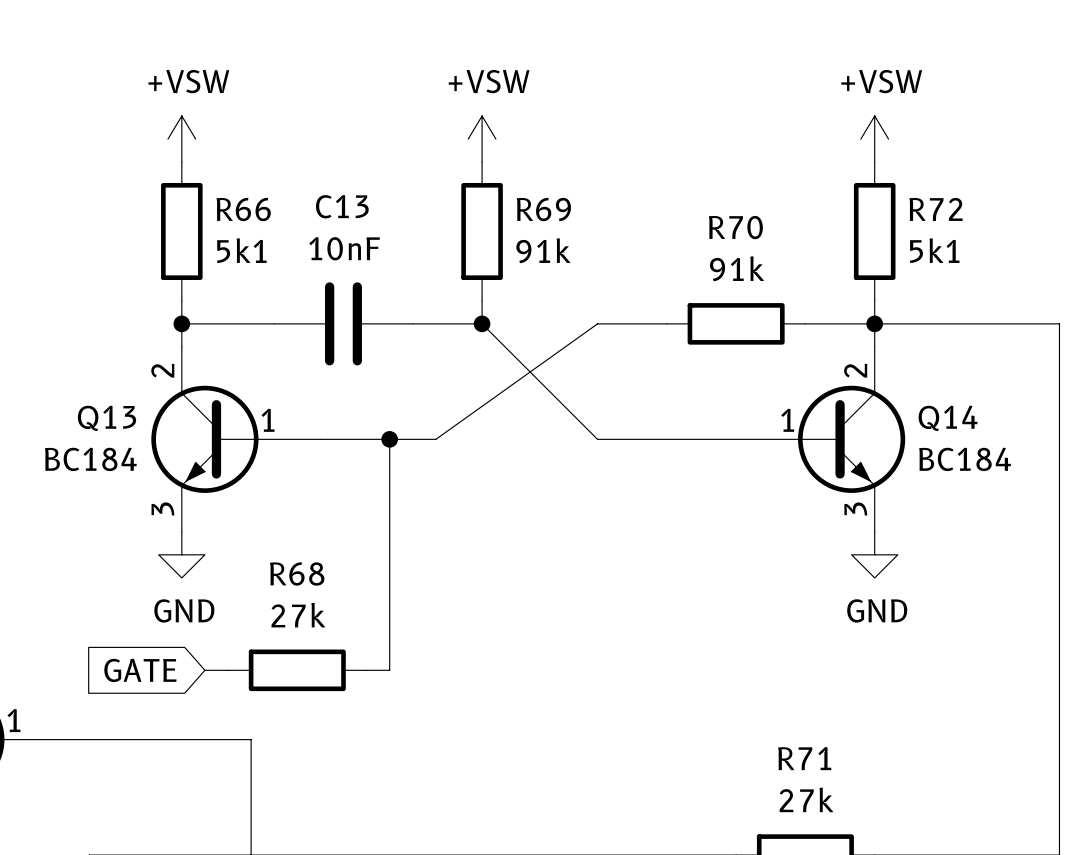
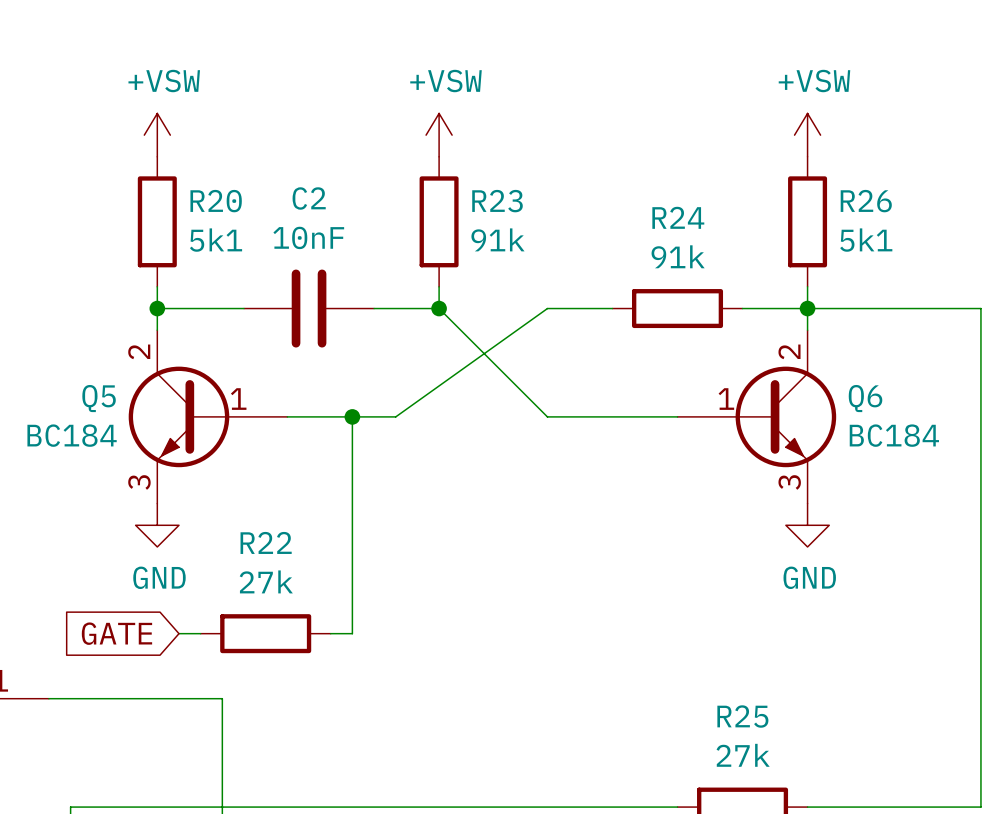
C13 name: C13 (342, 206) -> C2 (309, 198)
R66 name: R66 (243, 209) -> R20 (216, 201)
R69 name: R69 (543, 209) -> R23 (497, 201)
R72 name: R72 (935, 209) -> R26 (866, 201)
R70 name: R70 (735, 227) -> R24 (678, 217)
Q13 name: Q13 (106, 418) -> Q5 (99, 398)
Q14 name: Q14 (948, 418) -> Q6 (865, 398)
R68 name: R68 (297, 573) -> R22 (266, 542)
R71 name: R71 (804, 758) -> R25 (742, 716)

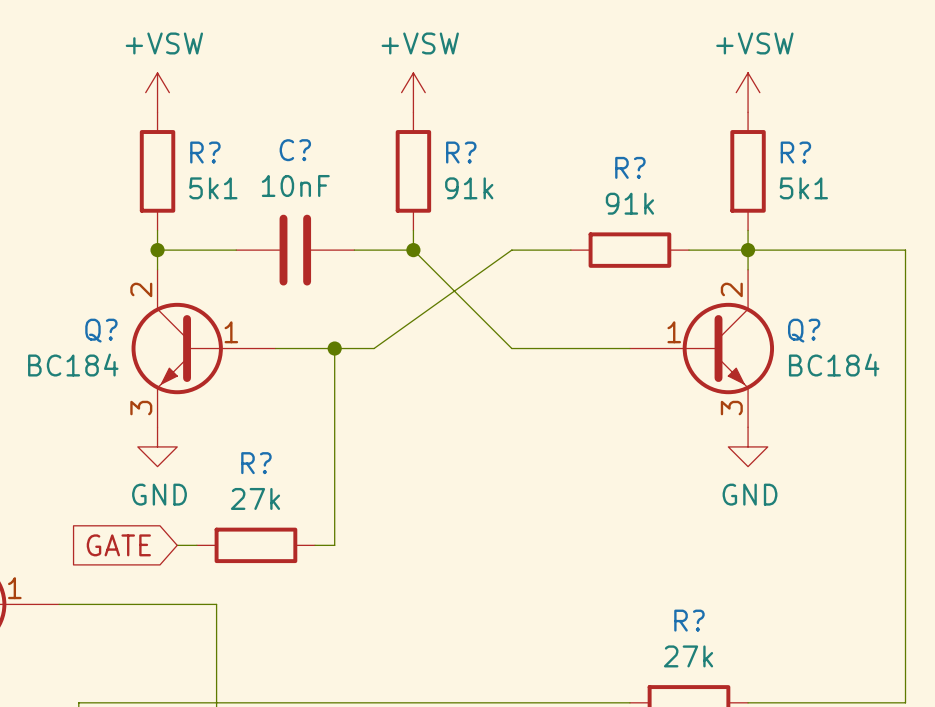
C2 name: C2 (309, 198) -> C? (295, 150)
R20 name: R20 (216, 201) -> R? (205, 152)
R23 name: R23 (497, 201) -> R? (461, 152)
R26 name: R26 (866, 201) -> R? (795, 152)
R24 name: R24 (678, 217) -> R? (630, 167)
Q5 name: Q5 (99, 398) -> Q? (101, 330)
Q6 name: Q6 (865, 398) -> Q? (804, 330)
R22 name: R22 (266, 542) -> R? (256, 463)
R25 name: R25 (742, 716) -> R? (689, 620)

